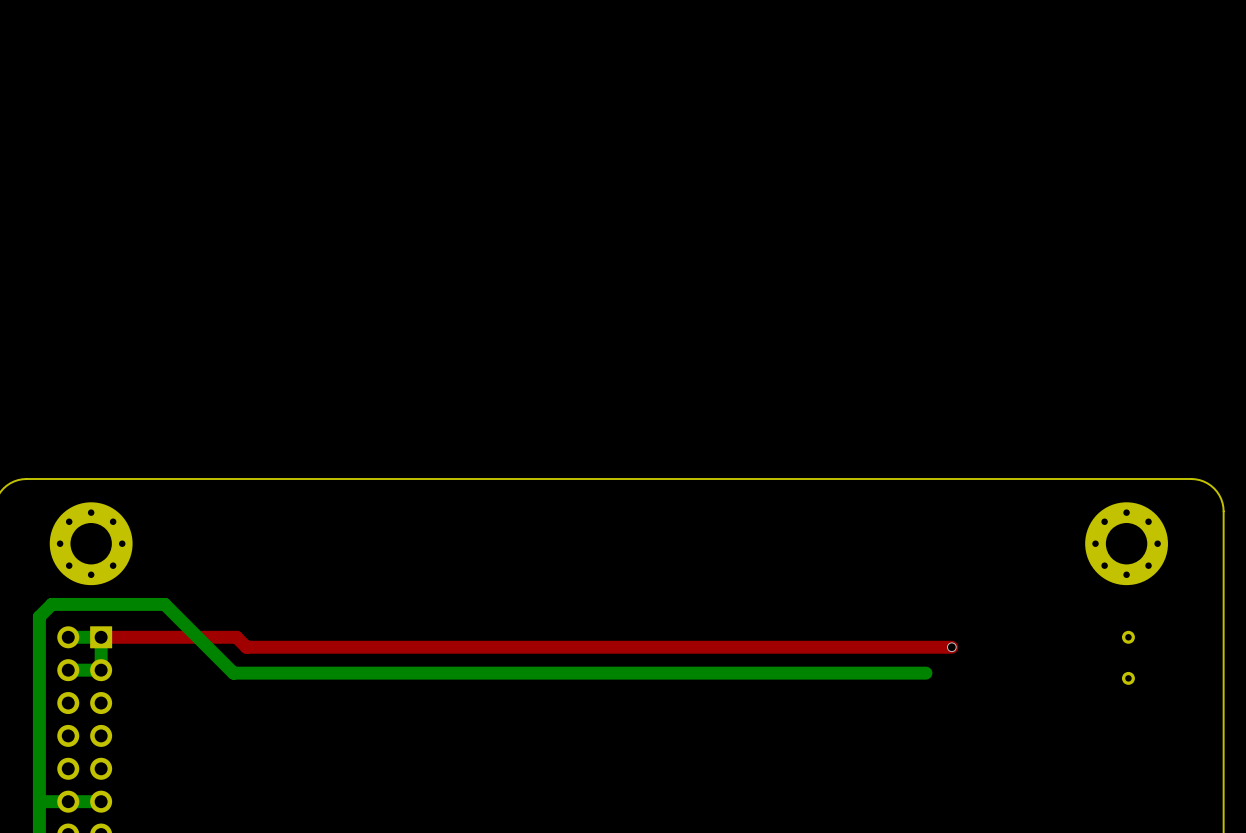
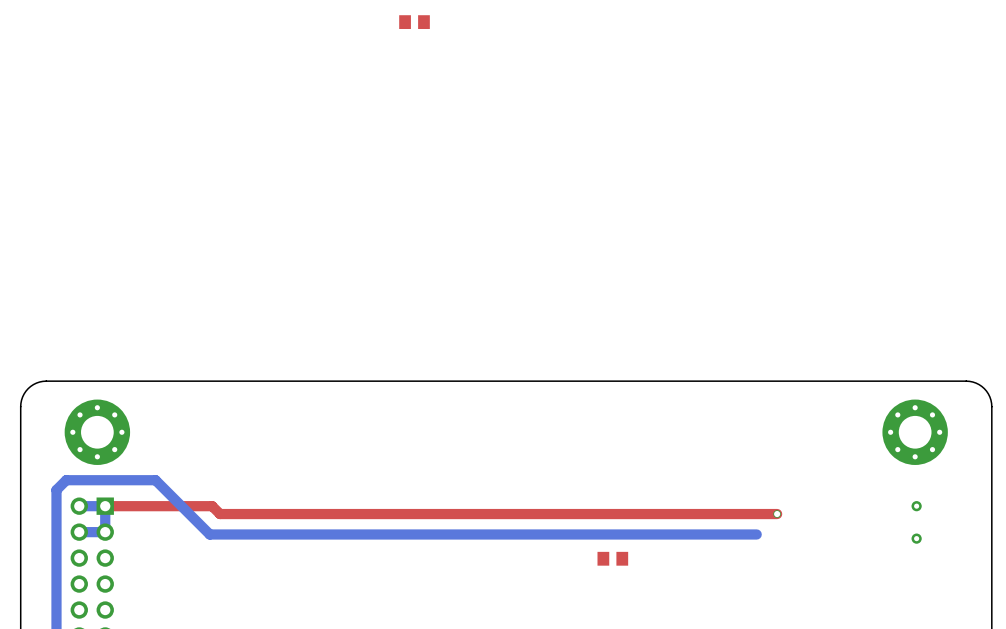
part: none -> (414, 22)
part: none -> (612, 558)

